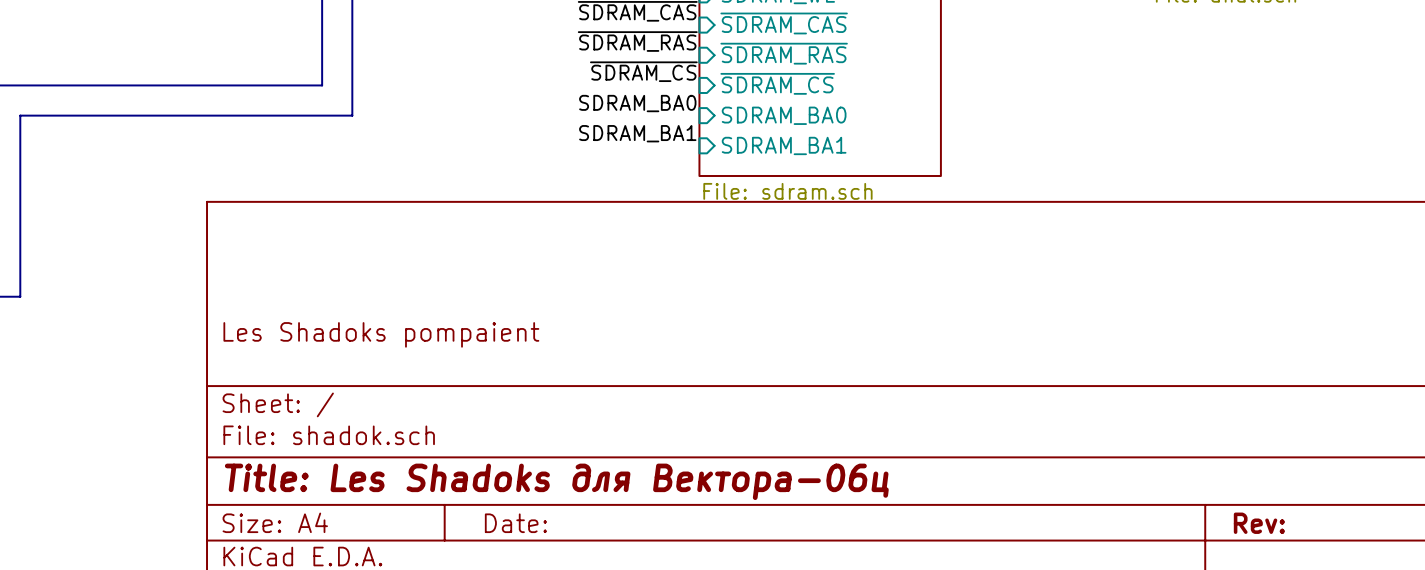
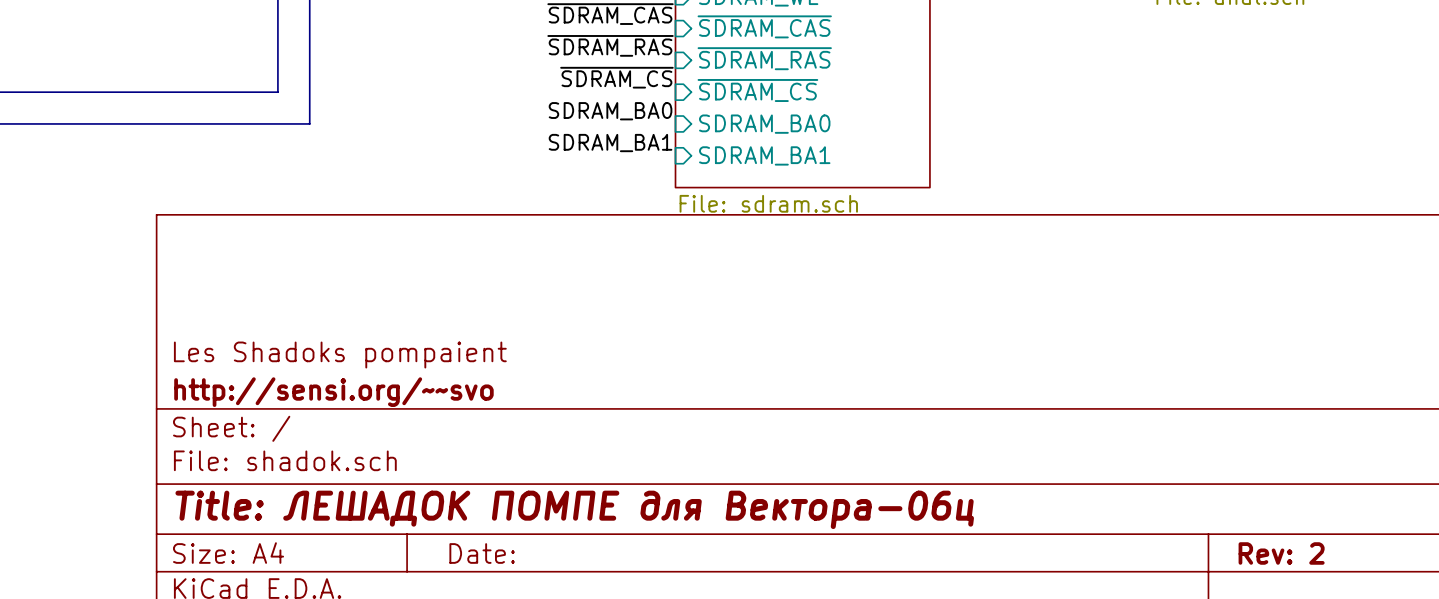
title block: none -> http://sensi.org/~~svo (333, 392)
title block: Title: Les Shadoks для Вектора-06ц (556, 481) -> Title: ЛЕШАДОК ПОМПЕ для Вектора-06ц (574, 509)
title block: Rev: (1259, 523) -> Rev: 2 (1281, 553)

